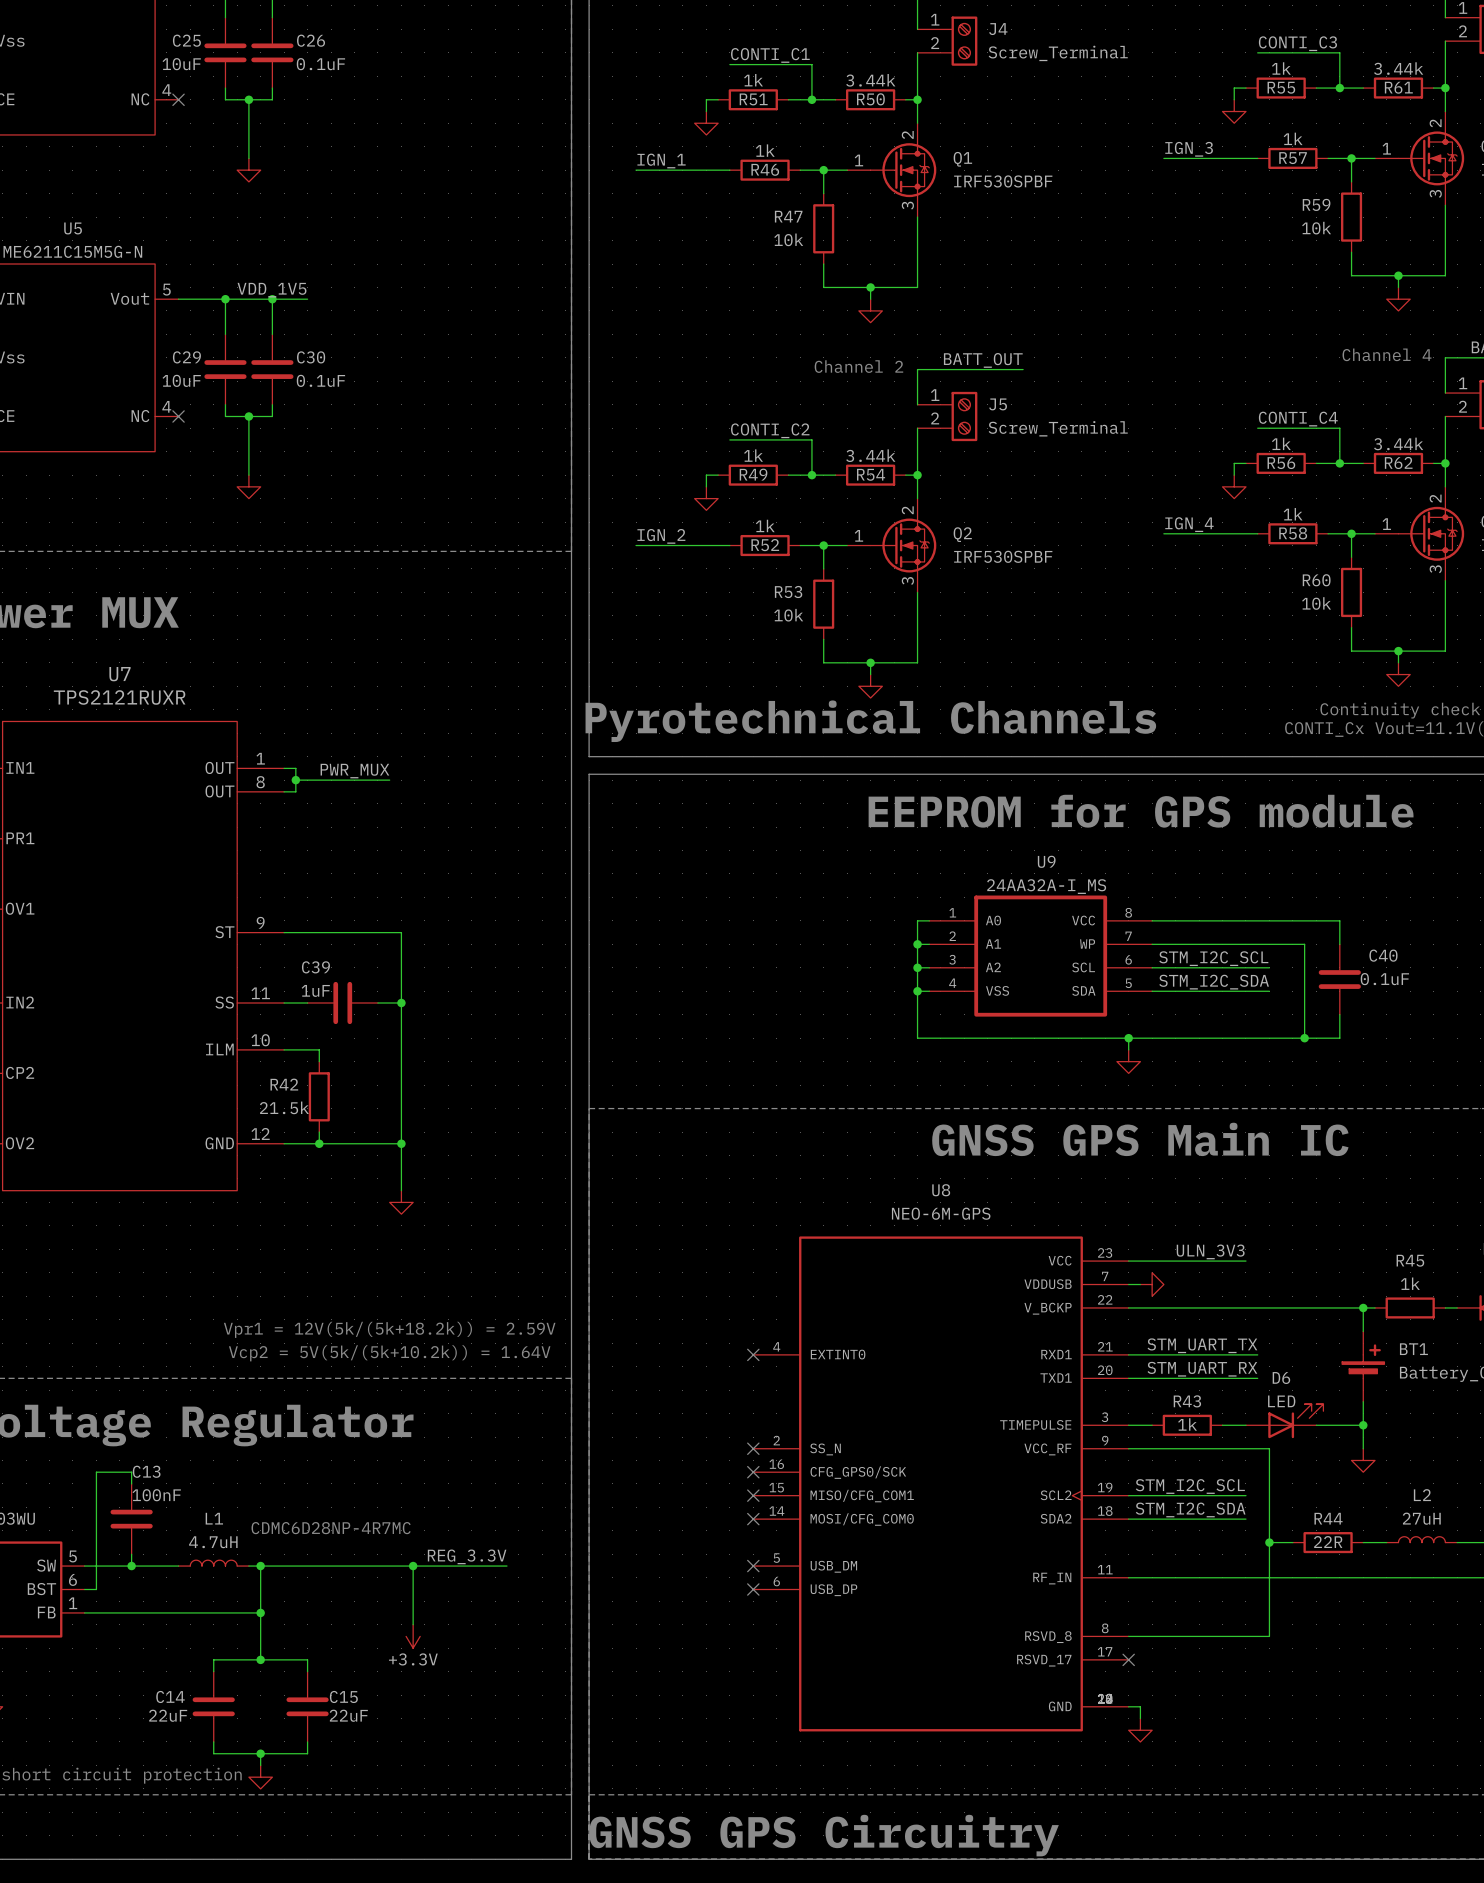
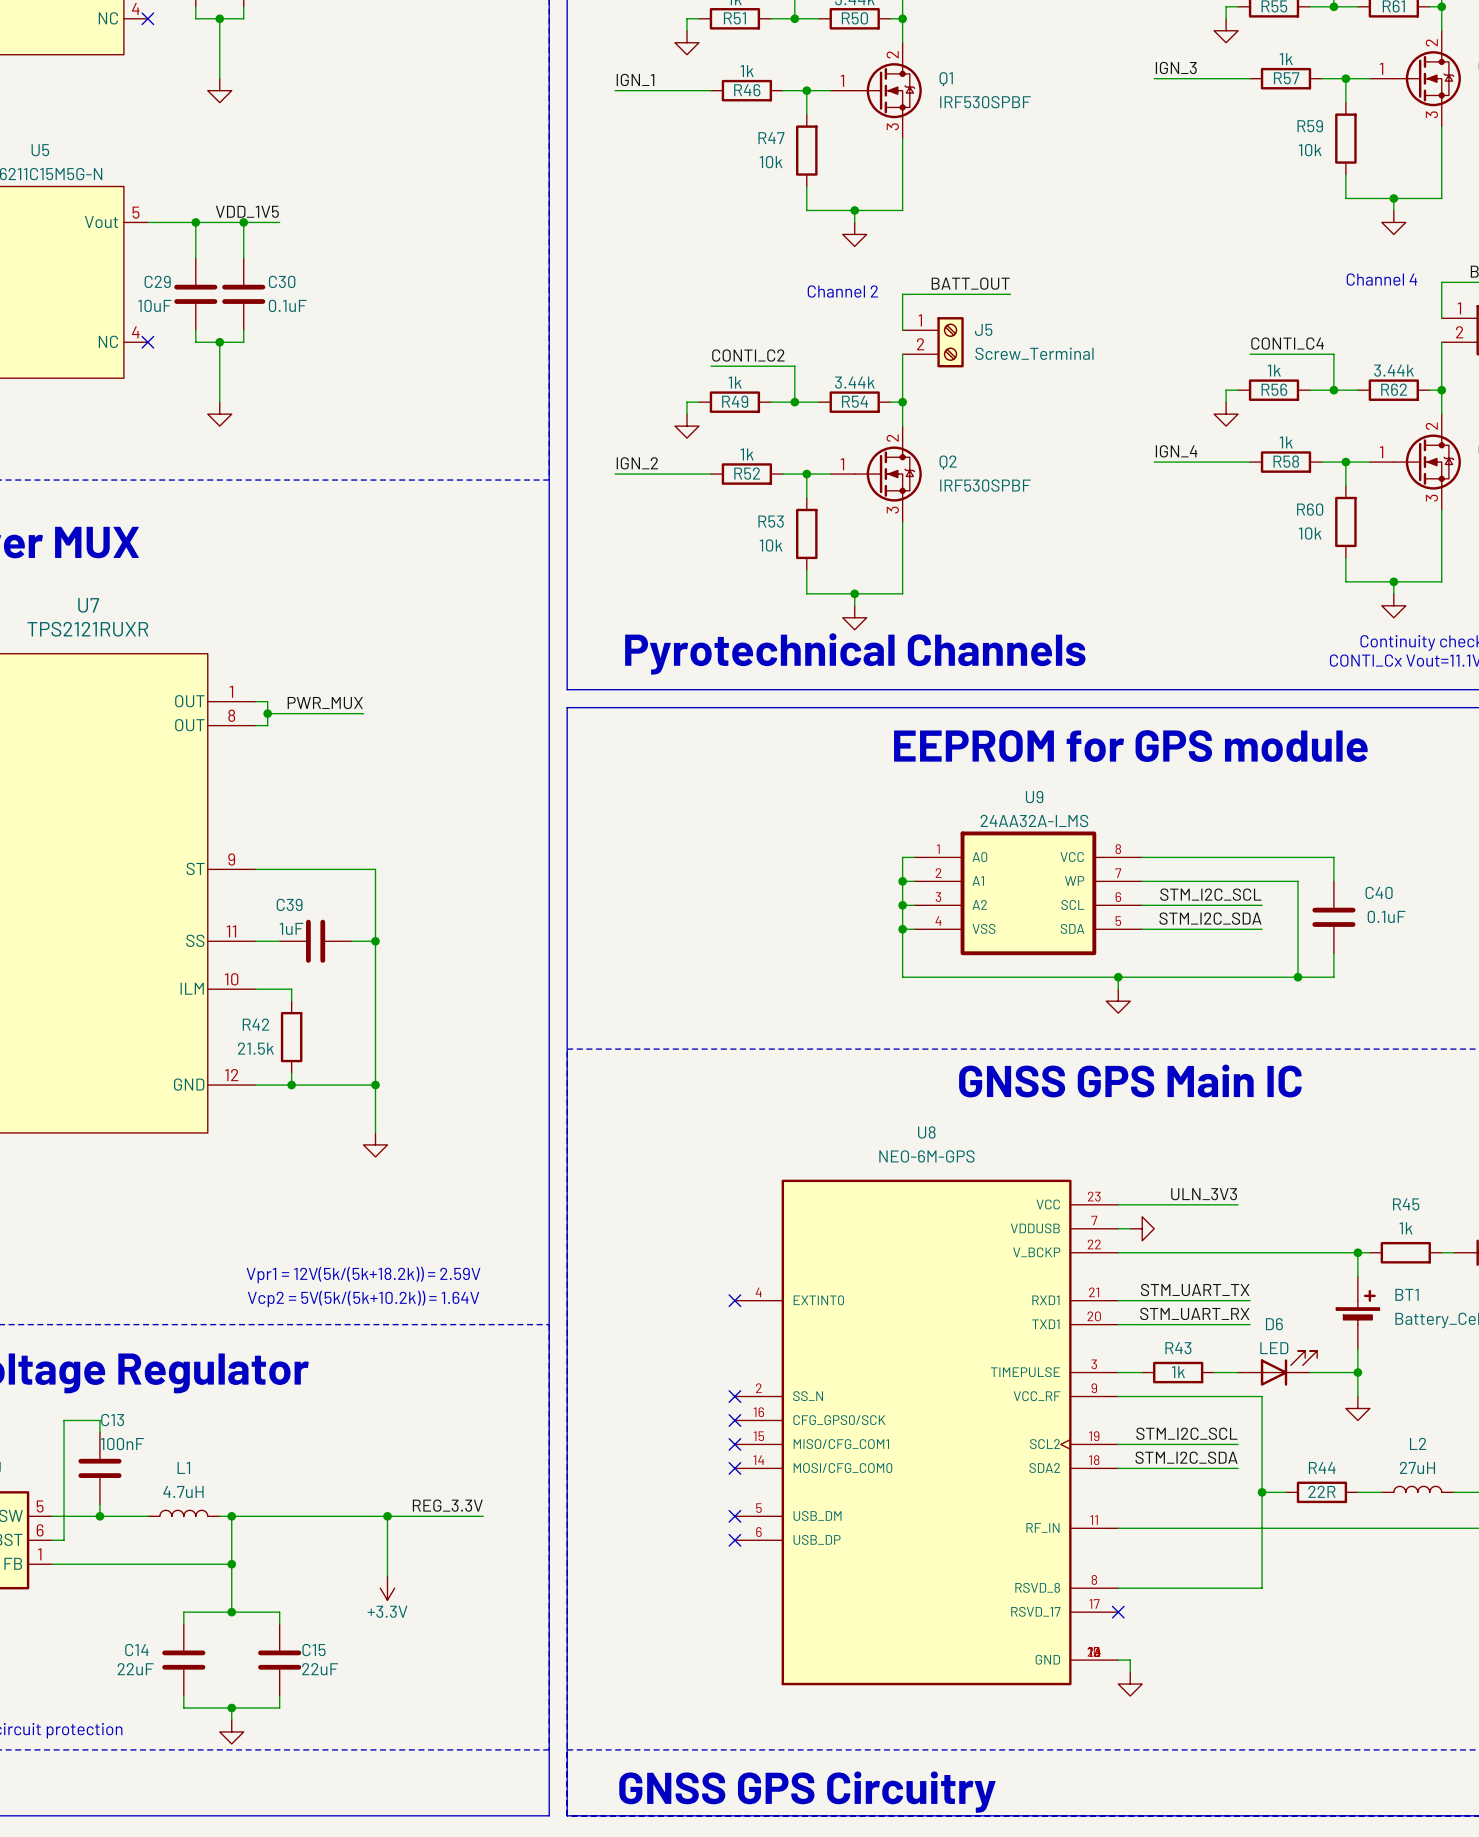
text: CDMC6D28NP-4R7MC (331, 1528) -> none

